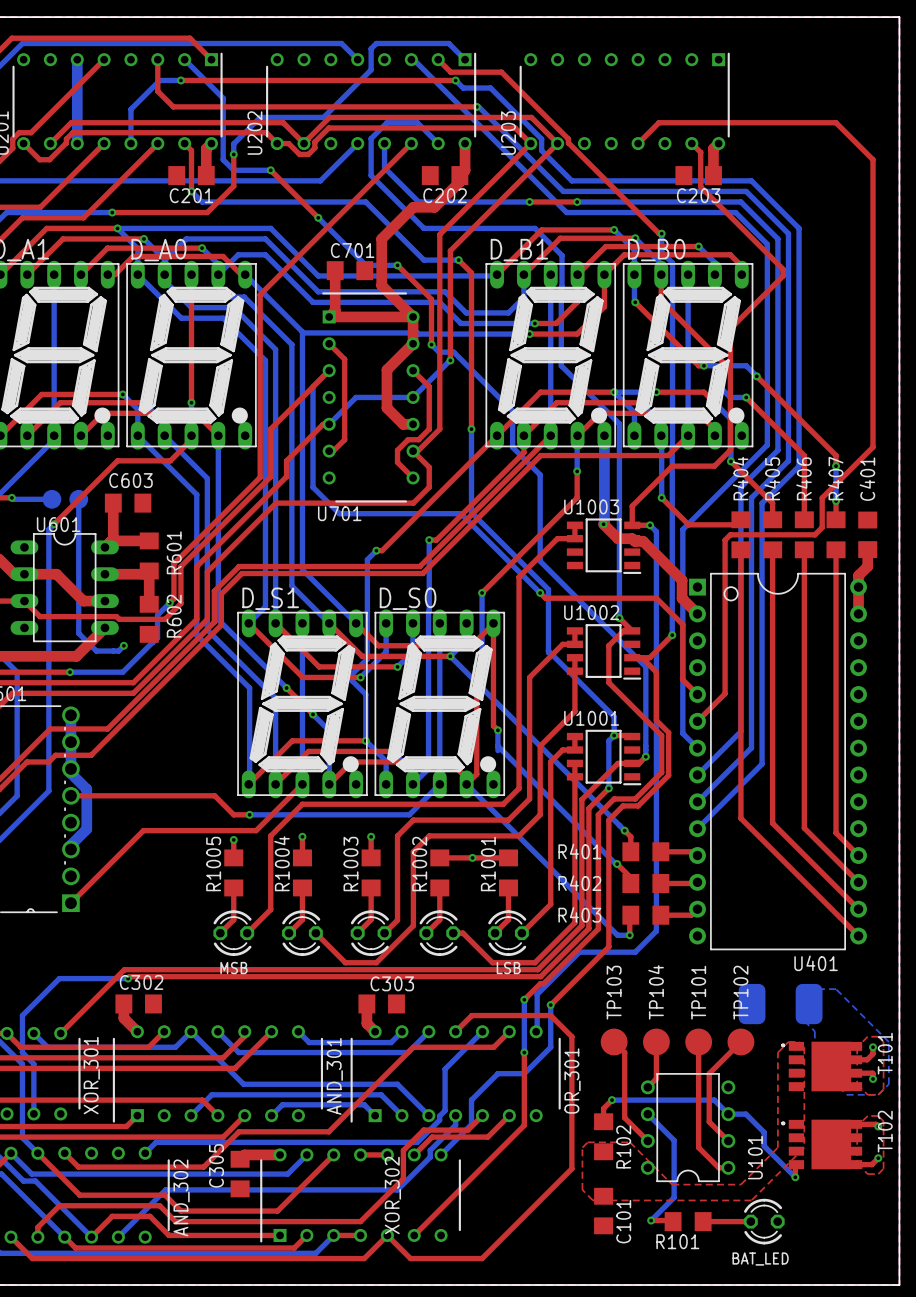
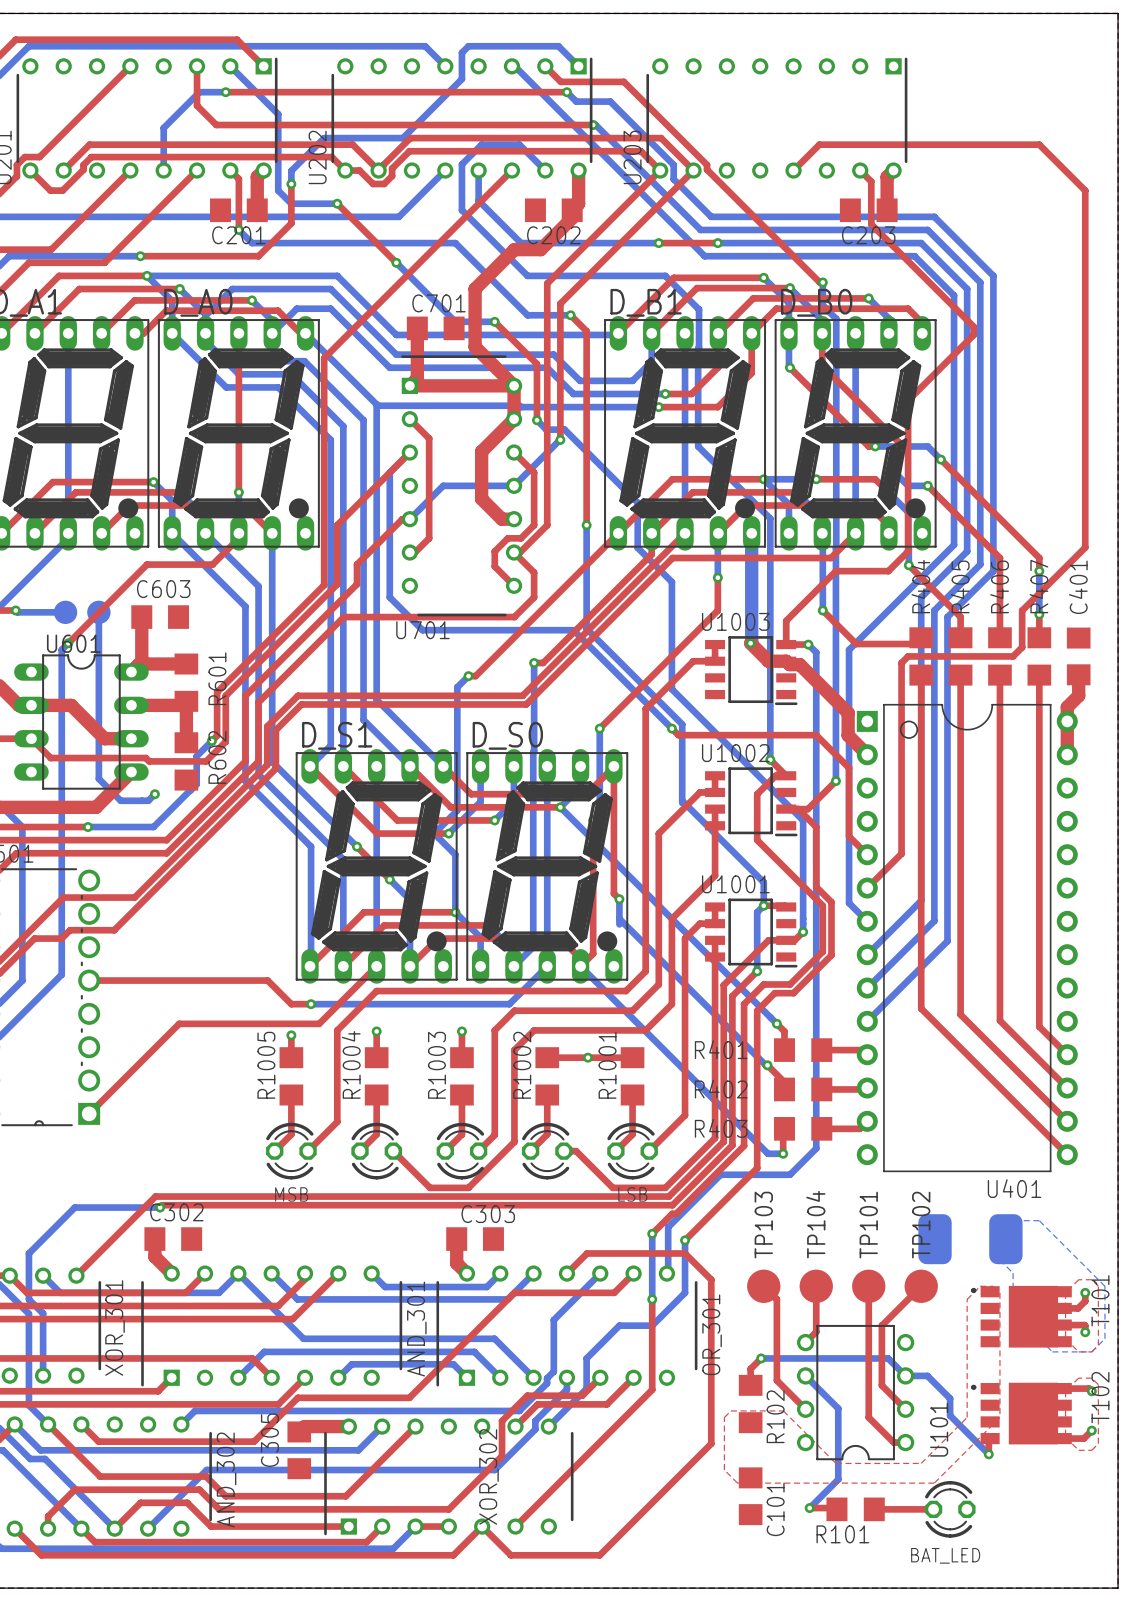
bottom track: (77, 59) (77, 143) -> none
bottom track: (70, 715) (70, 773) (86, 789) (86, 829) (70, 845) (70, 849) -> none
top track: (360, 1154) (387, 1154) -> none

